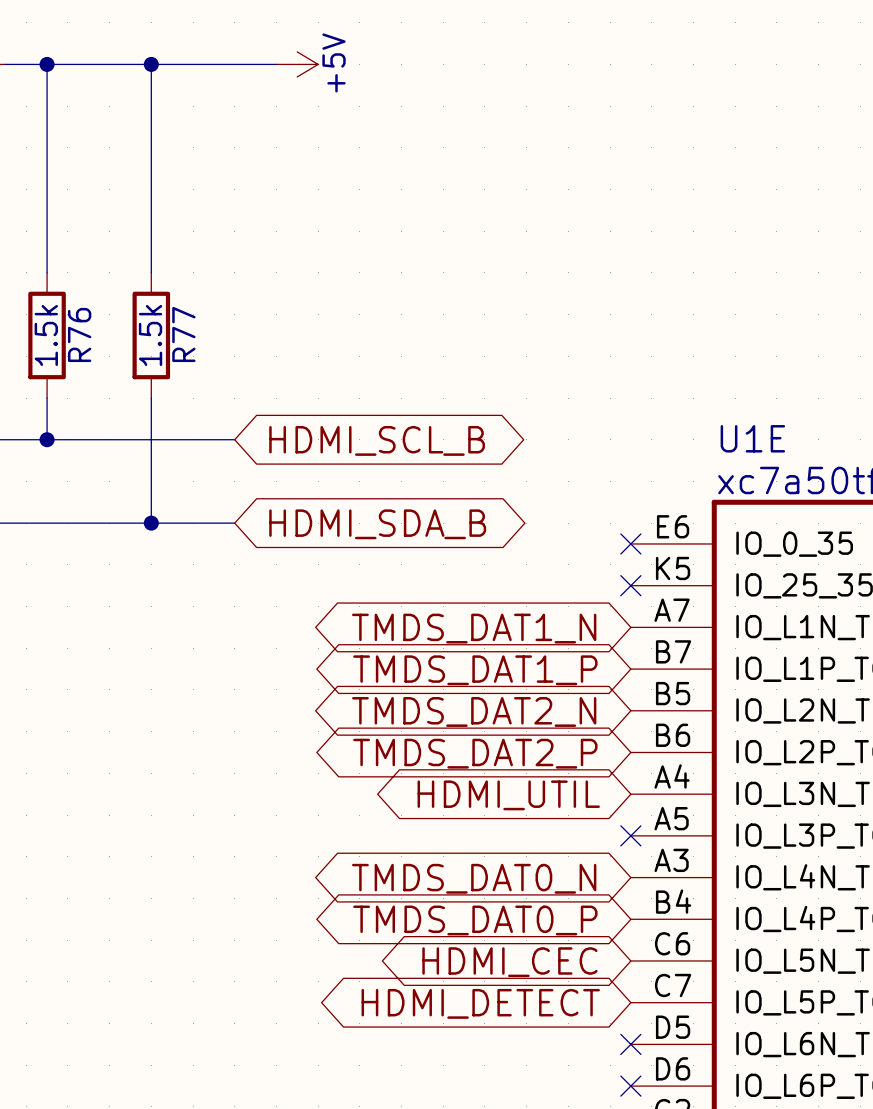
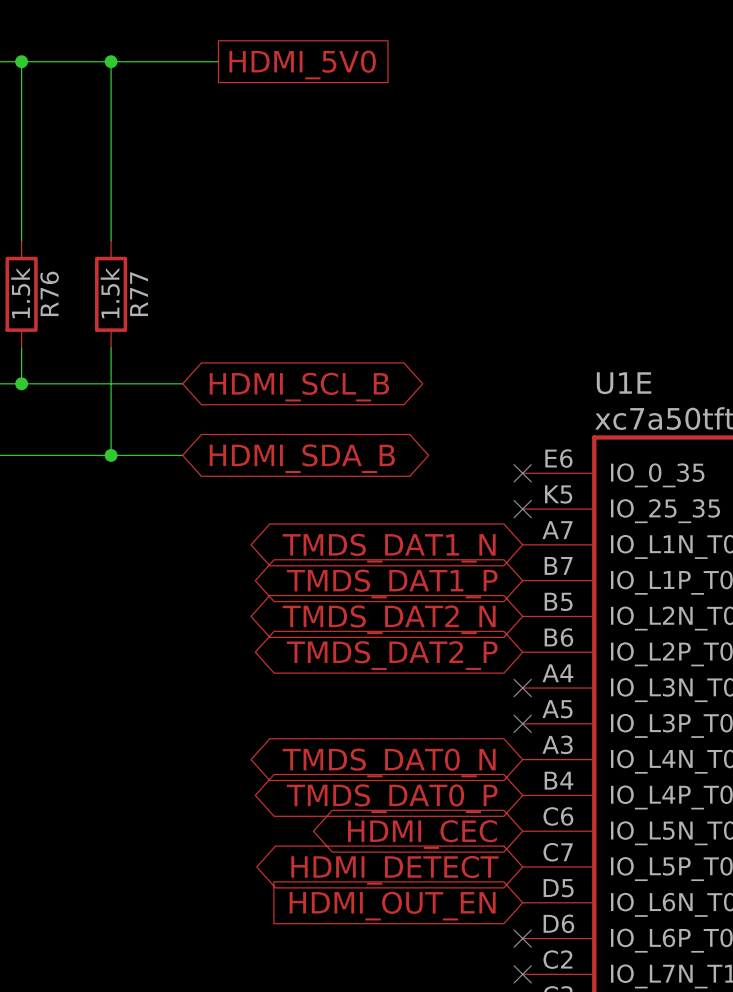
power symbol: +5V (297, 64) -> none
global label: none -> HDMI_5V0 (302, 64)
no-connect mark: none -> (522, 688)
global label: HDMI_UTIL (508, 795) -> none
no-connect mark: (630, 1044) -> none
global label: none -> HDMI_OUT_EN (392, 906)

